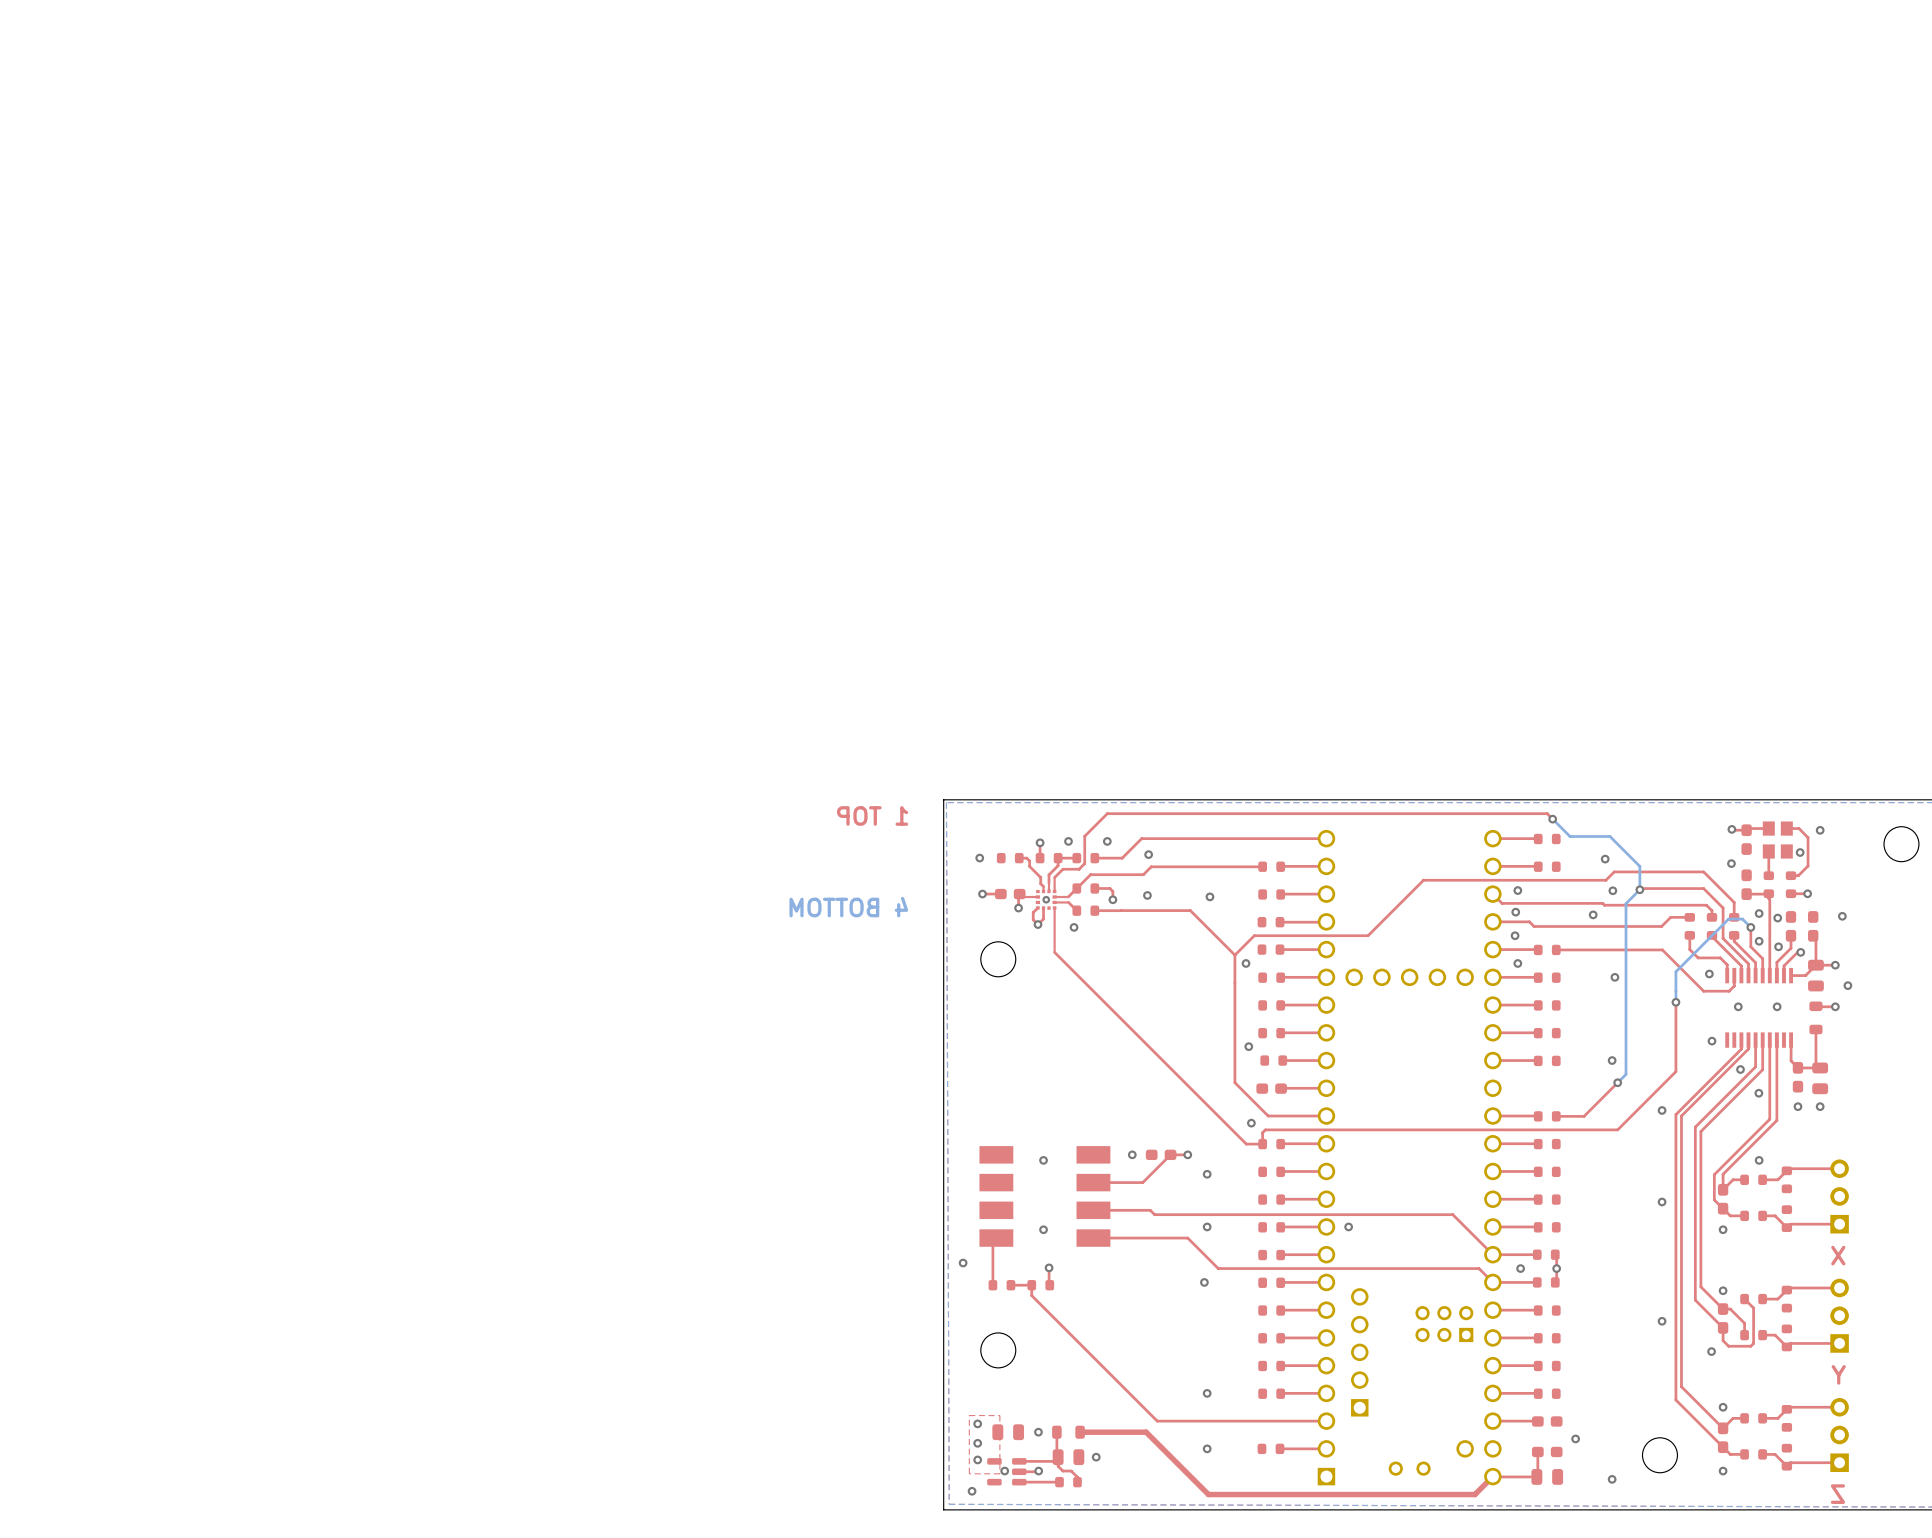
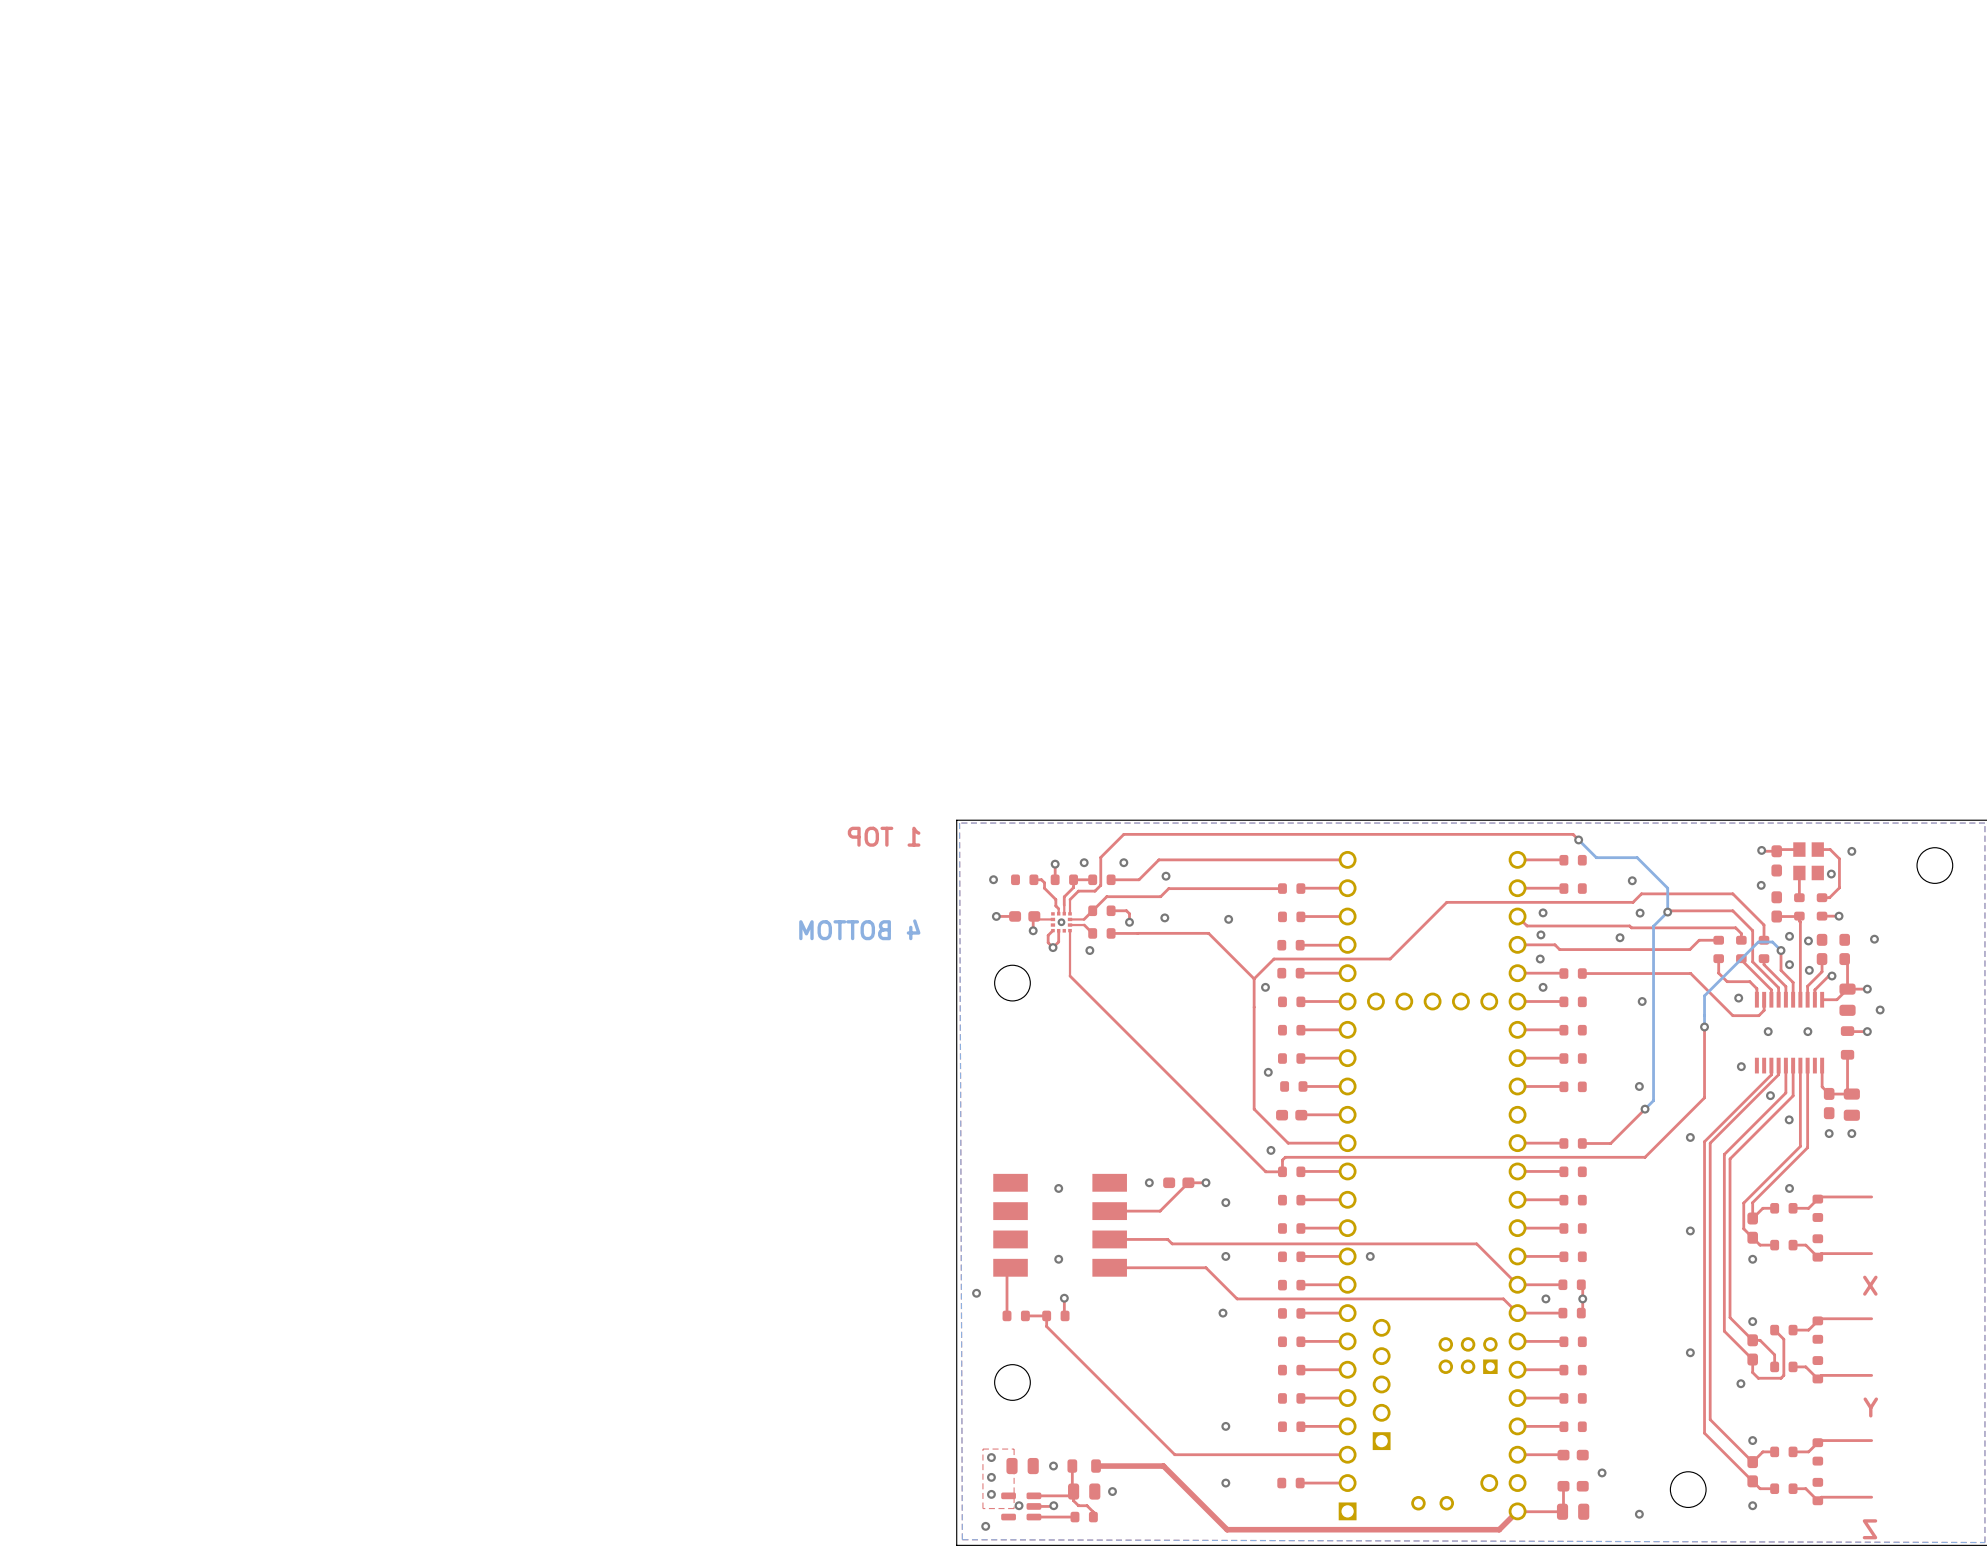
part: (1839, 1196) -> none
part: (1839, 1315) -> none
part: (1839, 1434) -> none

